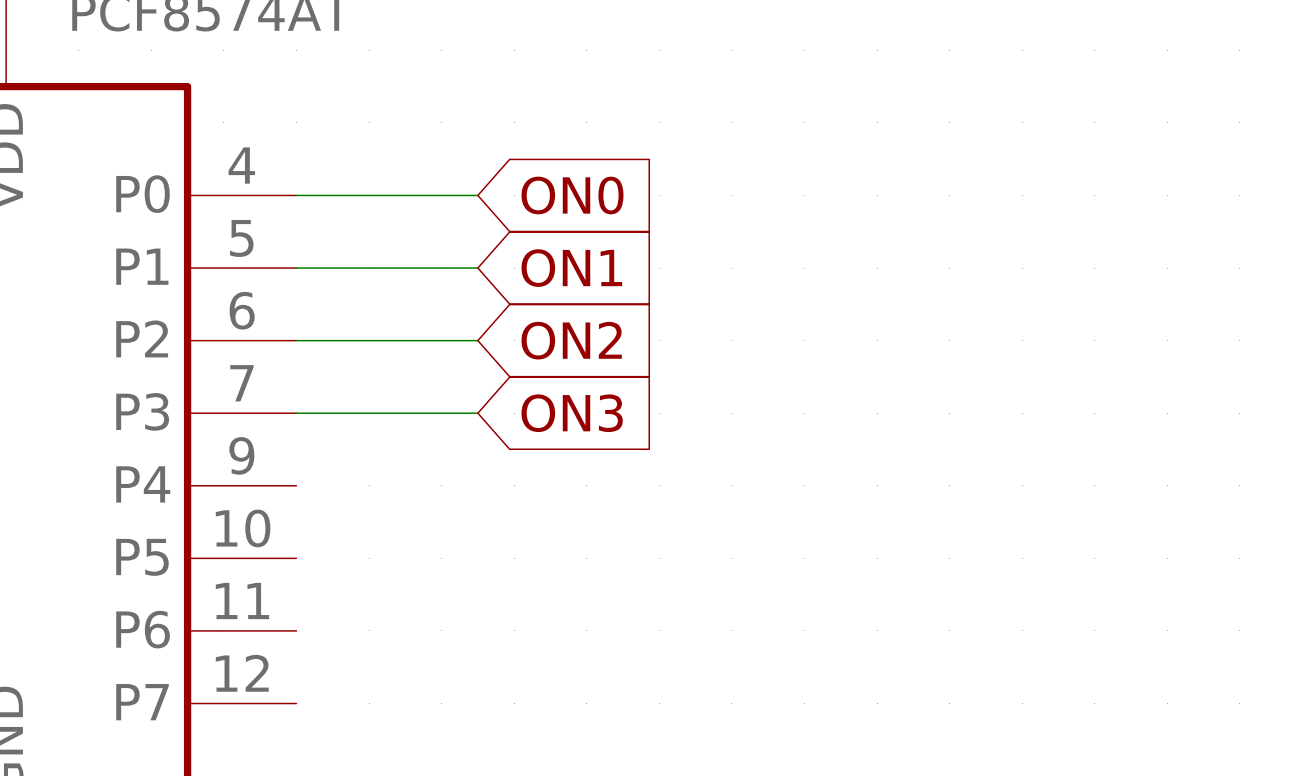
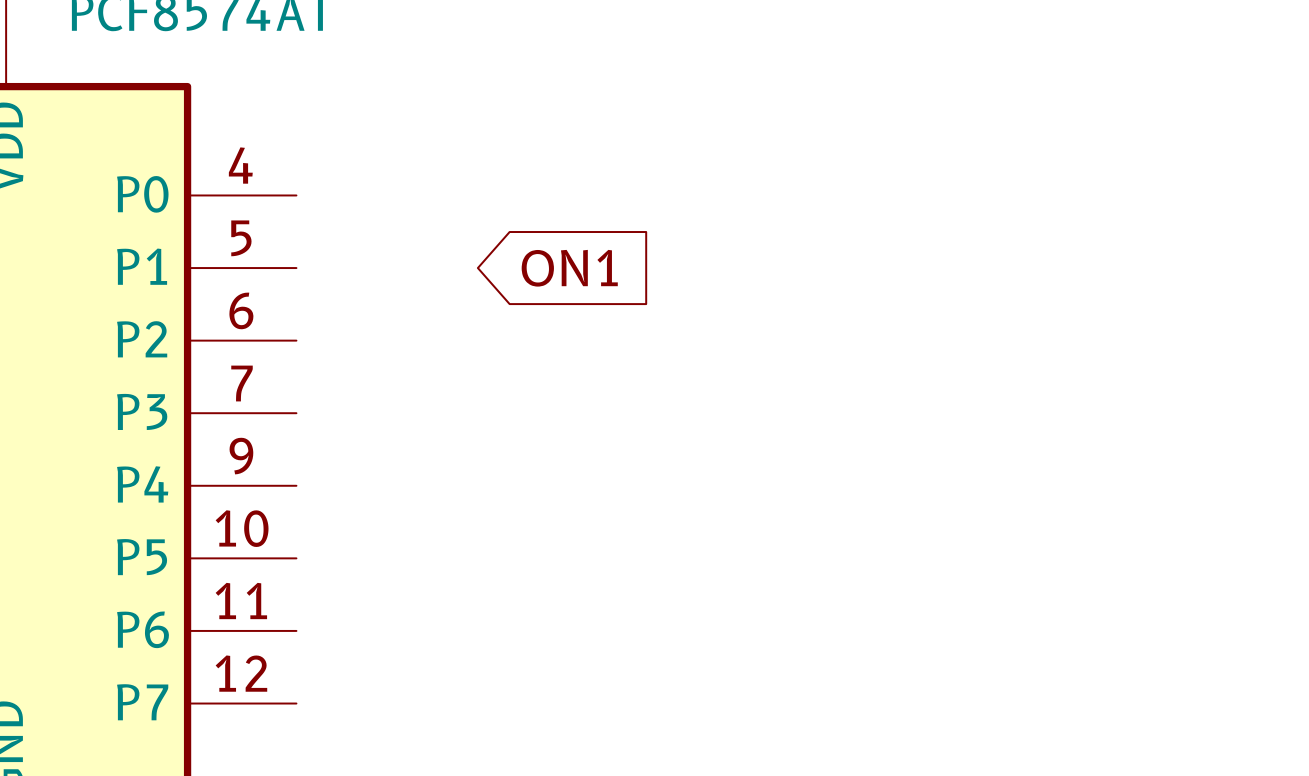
wire: (296, 195) (477, 195) -> none
global label: ON0 (572, 195) -> none
wire: (296, 268) (477, 268) -> none
wire: (296, 340) (477, 340) -> none
global label: ON2 (571, 340) -> none
wire: (296, 413) (477, 413) -> none
global label: ON3 (572, 413) -> none

